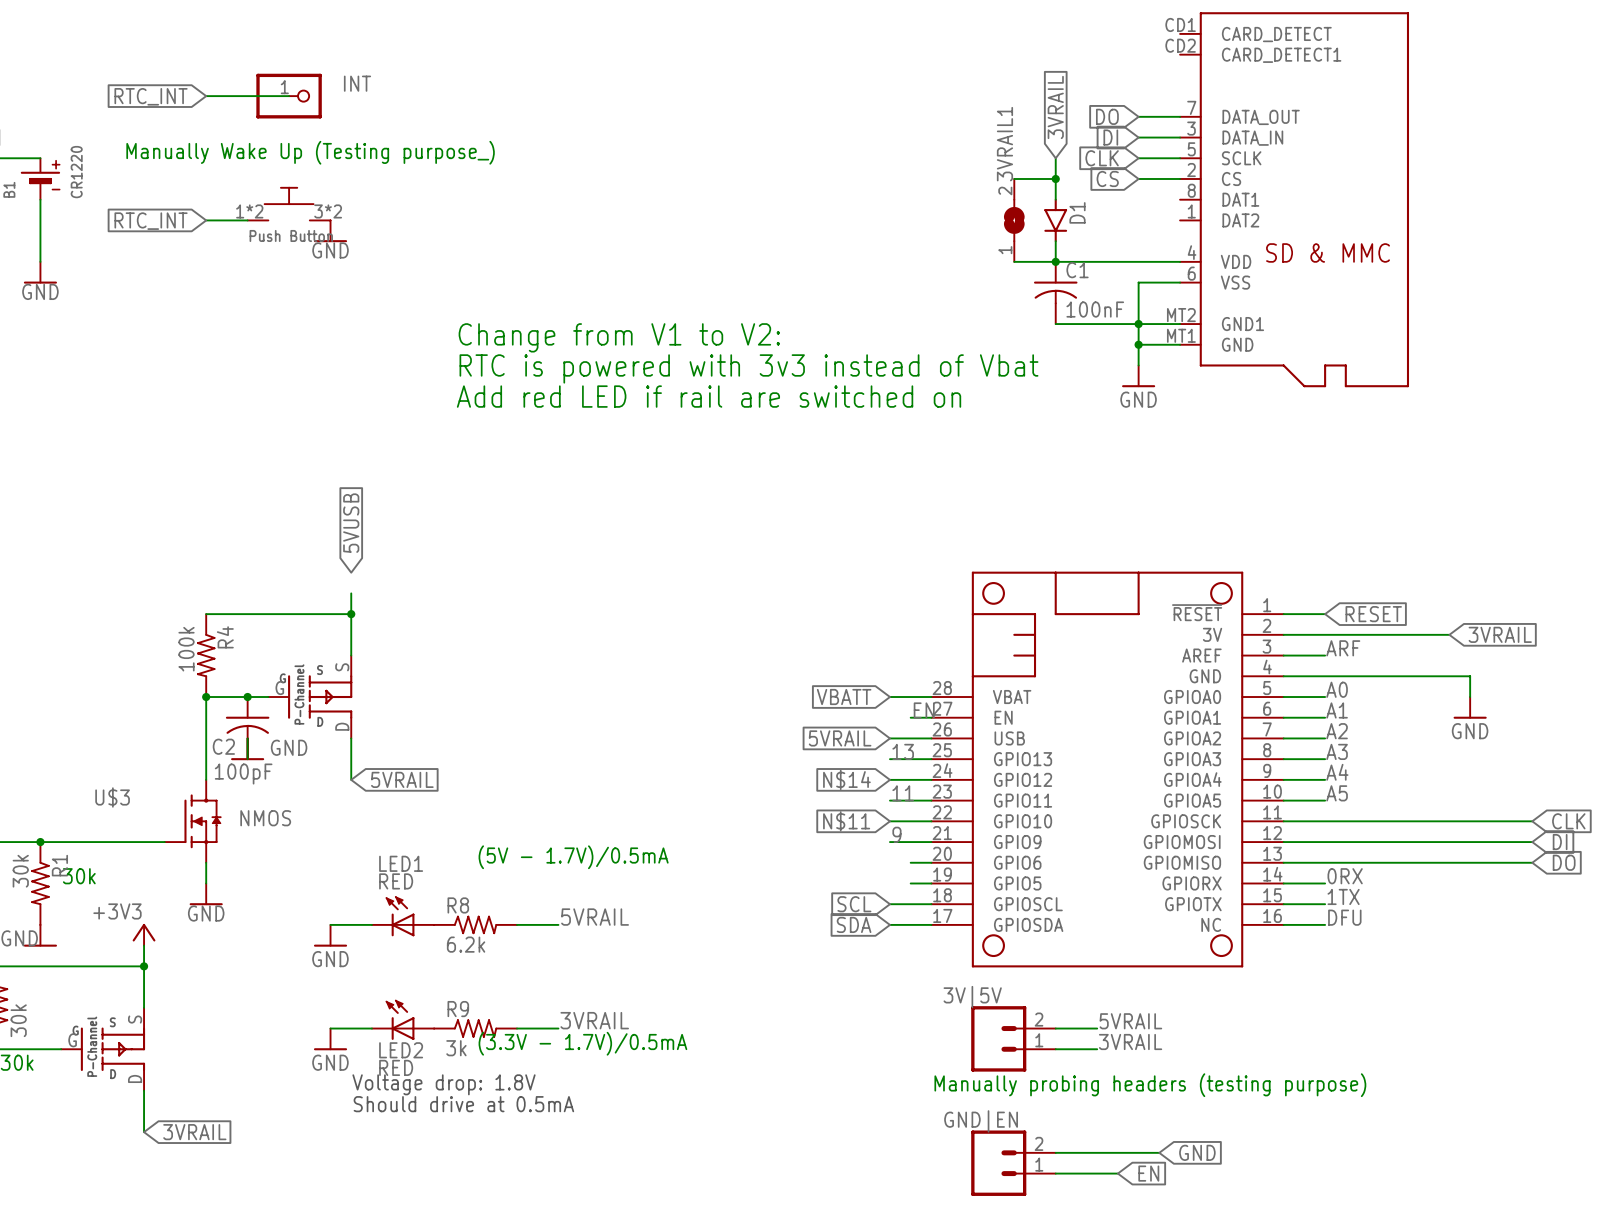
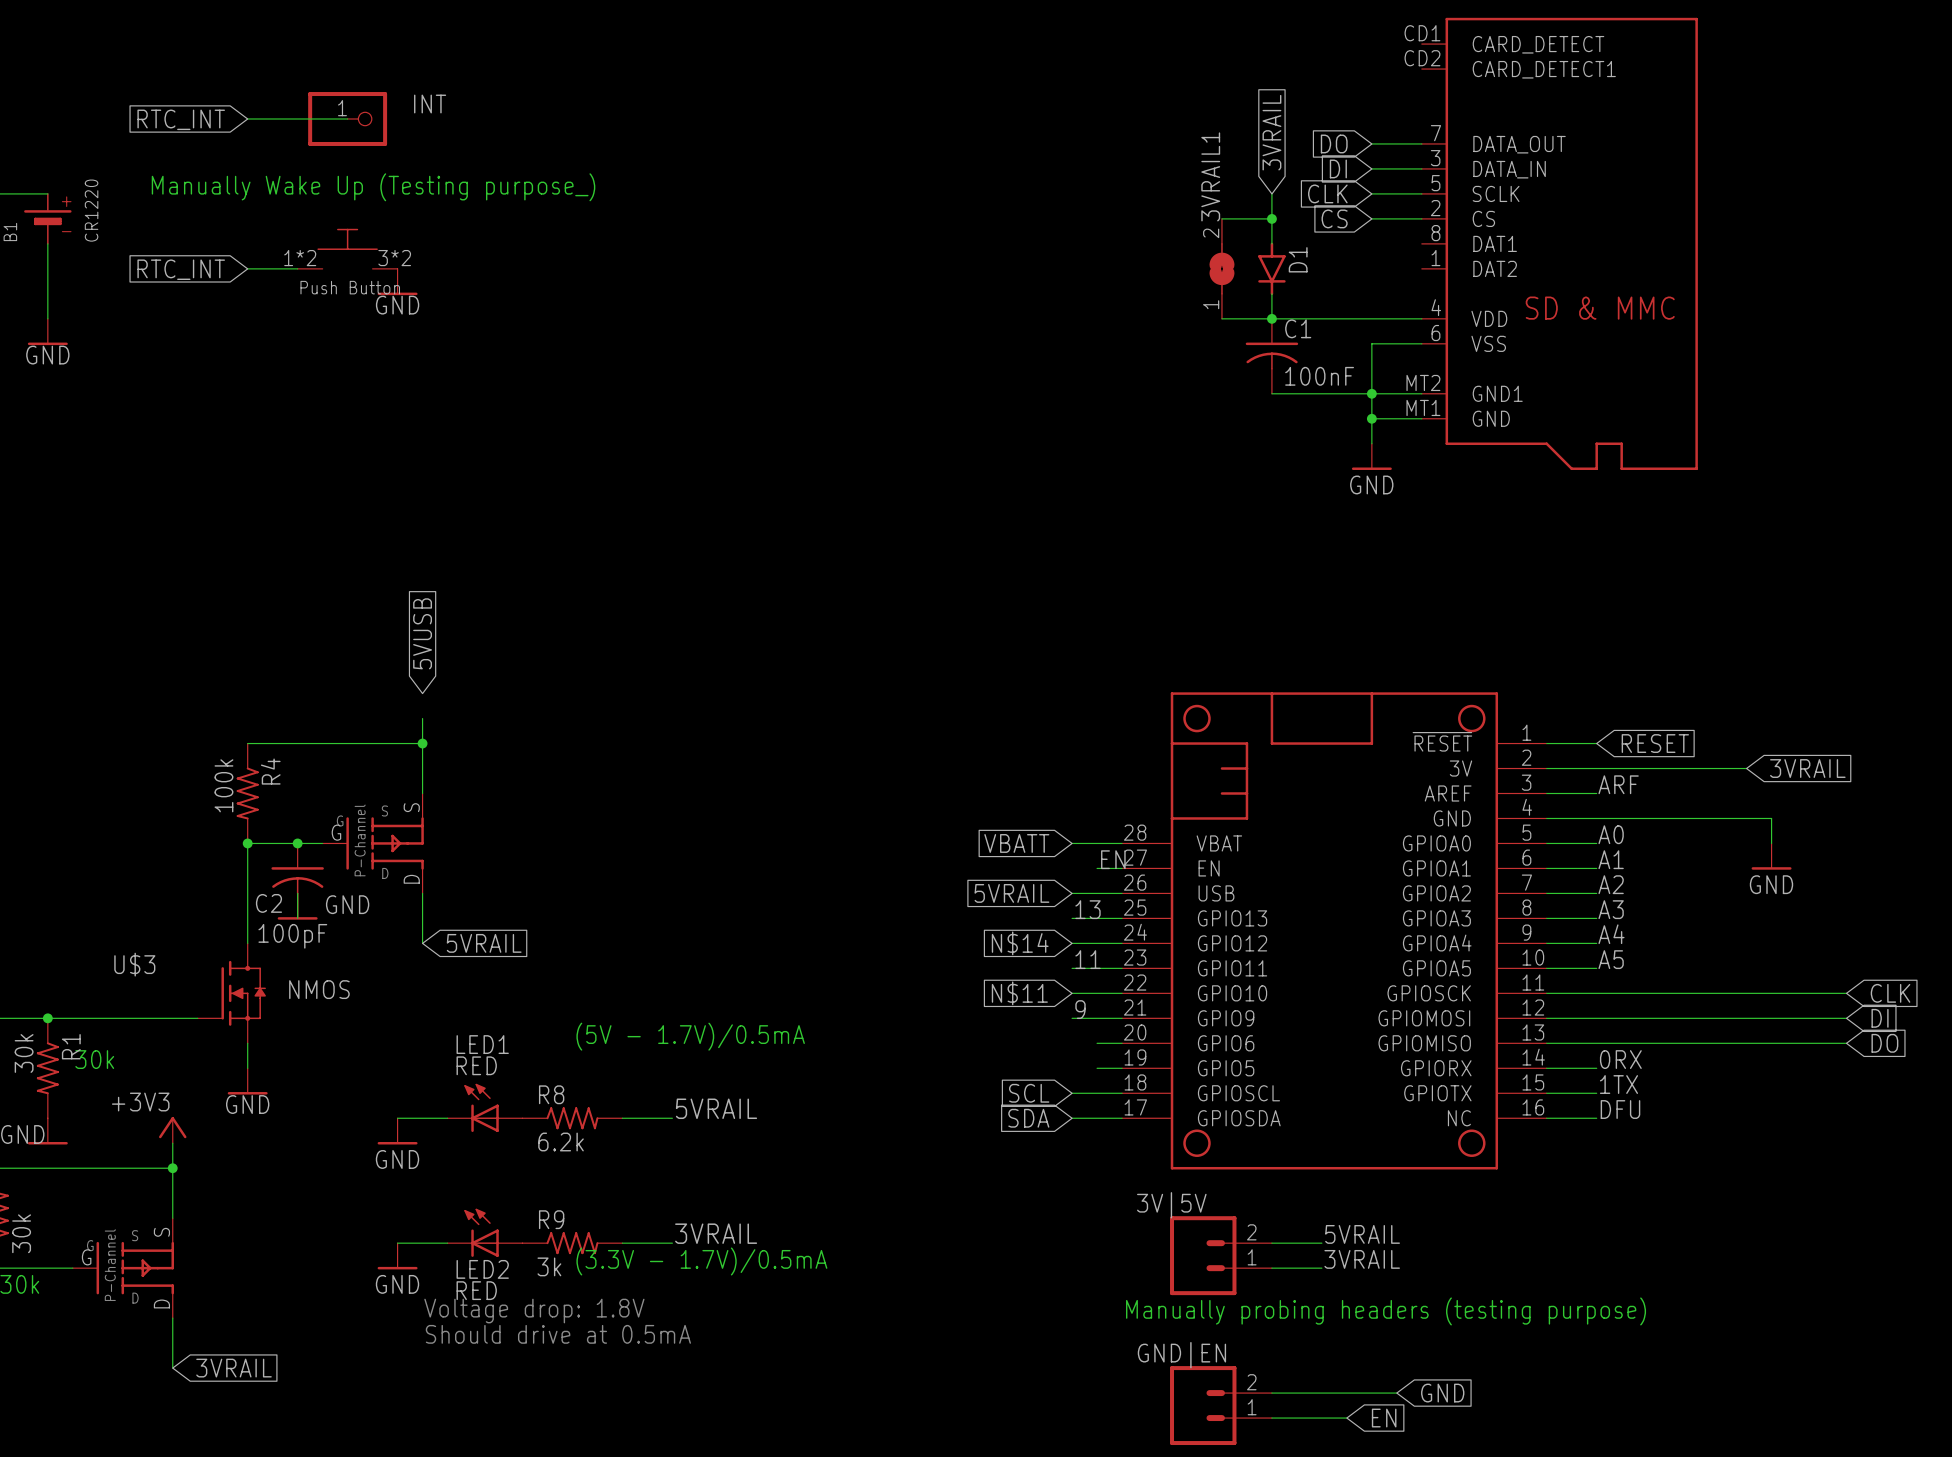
text: Change from V1 to V2: (619, 337) -> none
text: RTC is powered with 3v3 instead of Vbat (748, 368) -> none
text: Add red LED if rail are switched on (709, 396) -> none

